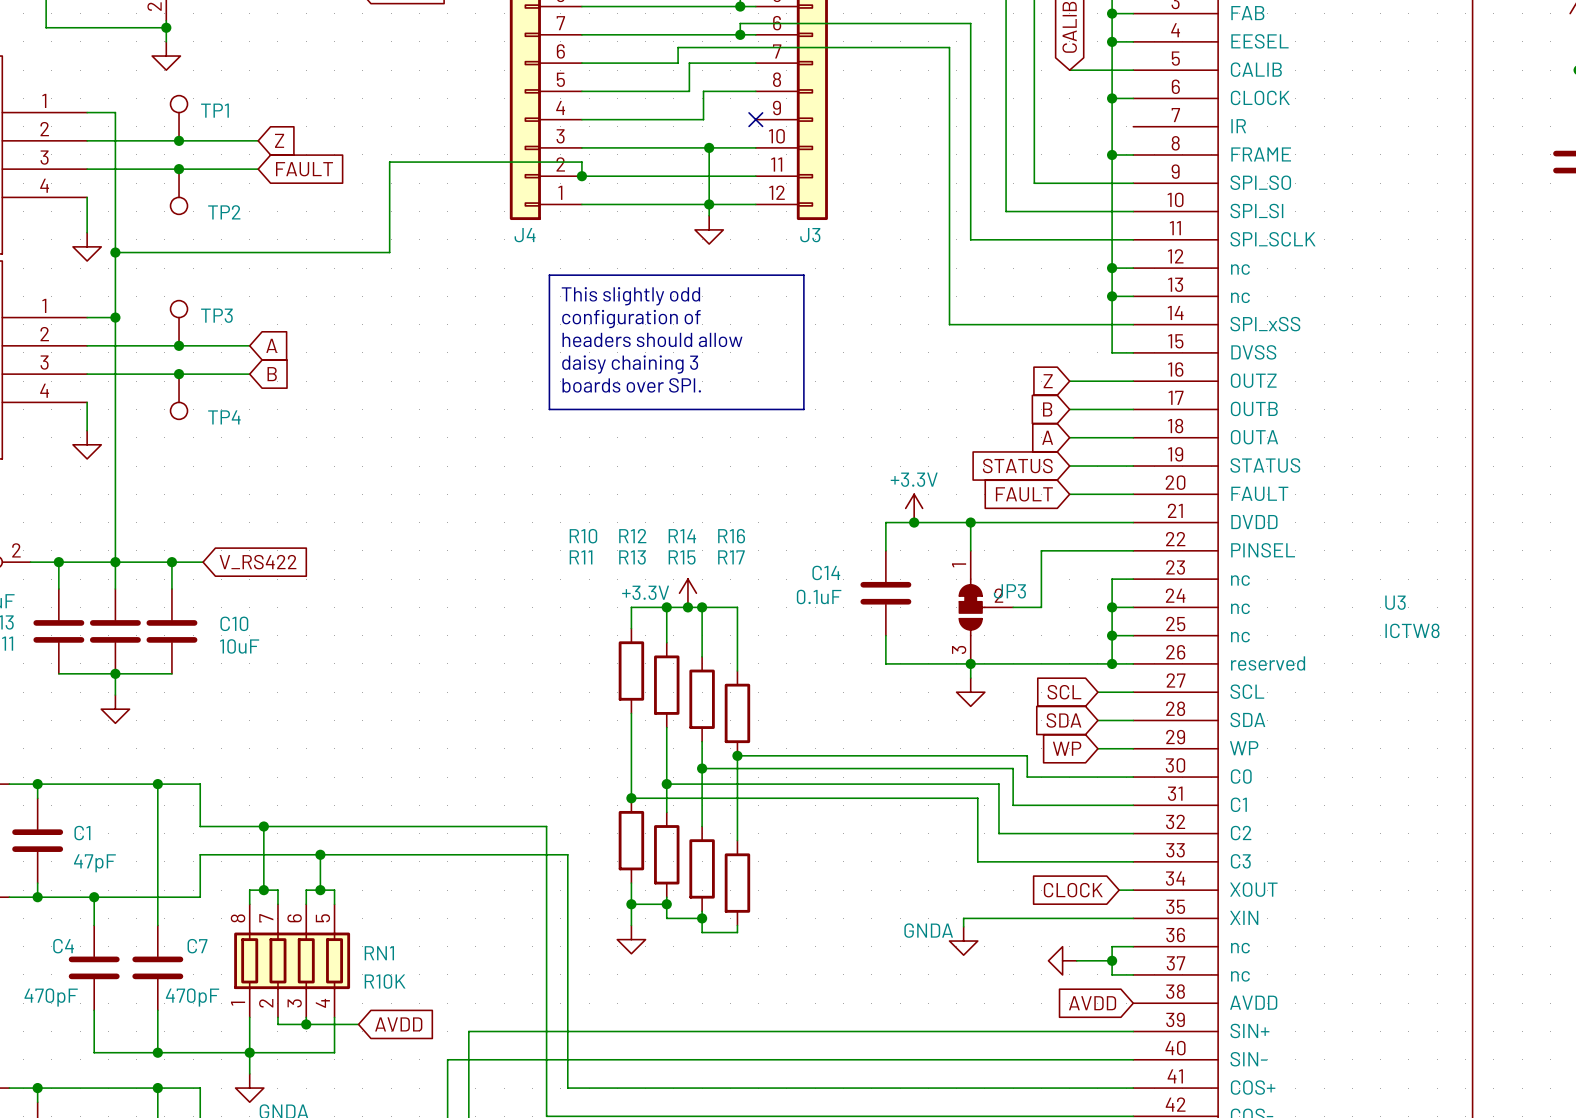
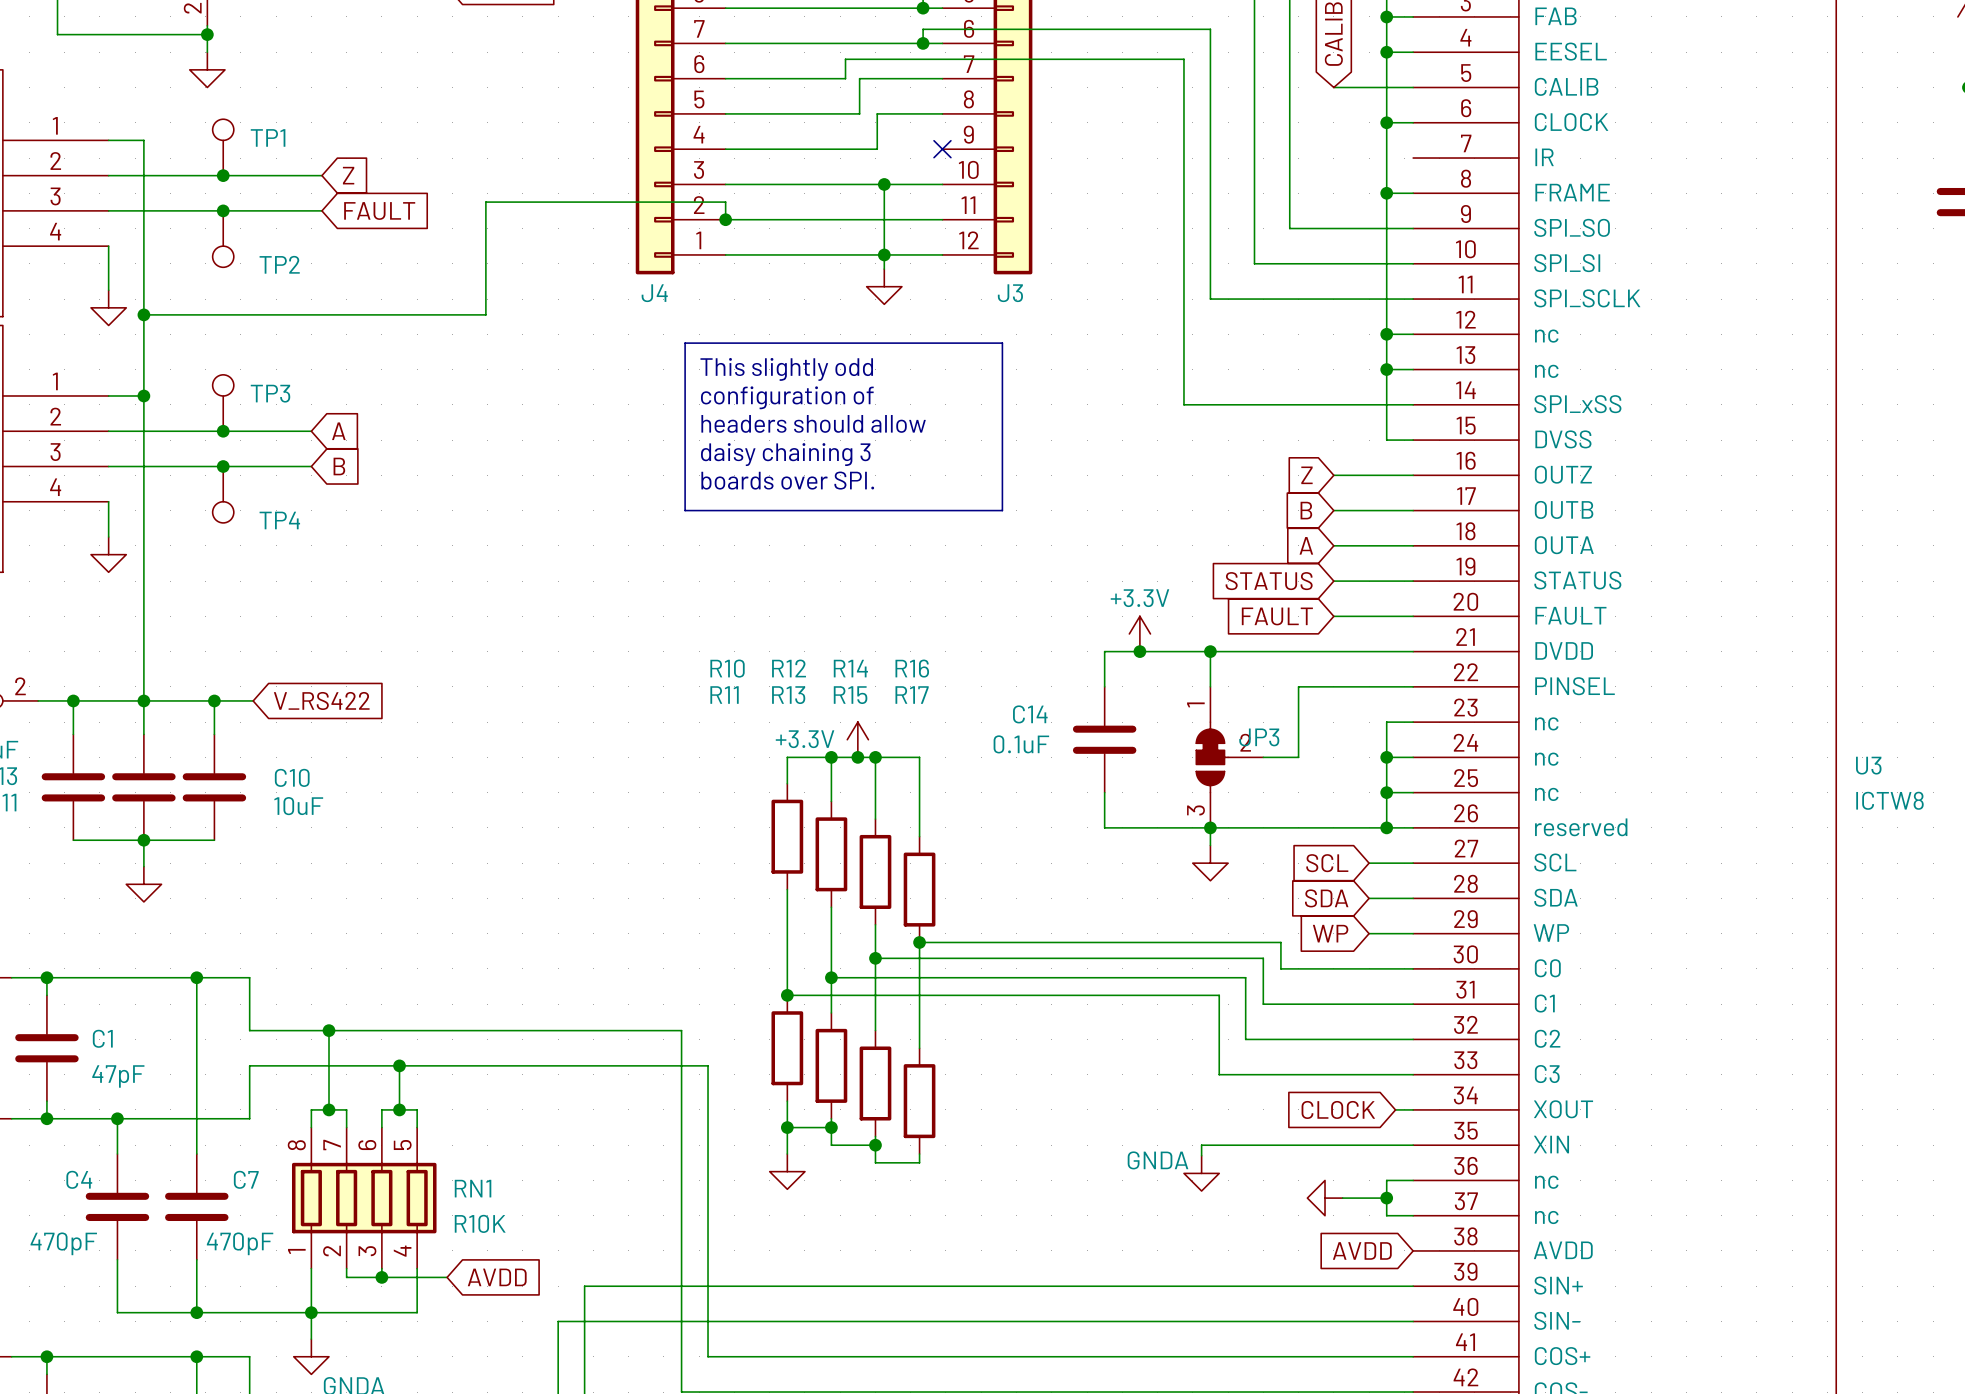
U3 name position: U3 (1395, 602) -> U3 (1868, 765)
U3 value position: ICTW8 (1412, 630) -> ICTW8 (1889, 800)

